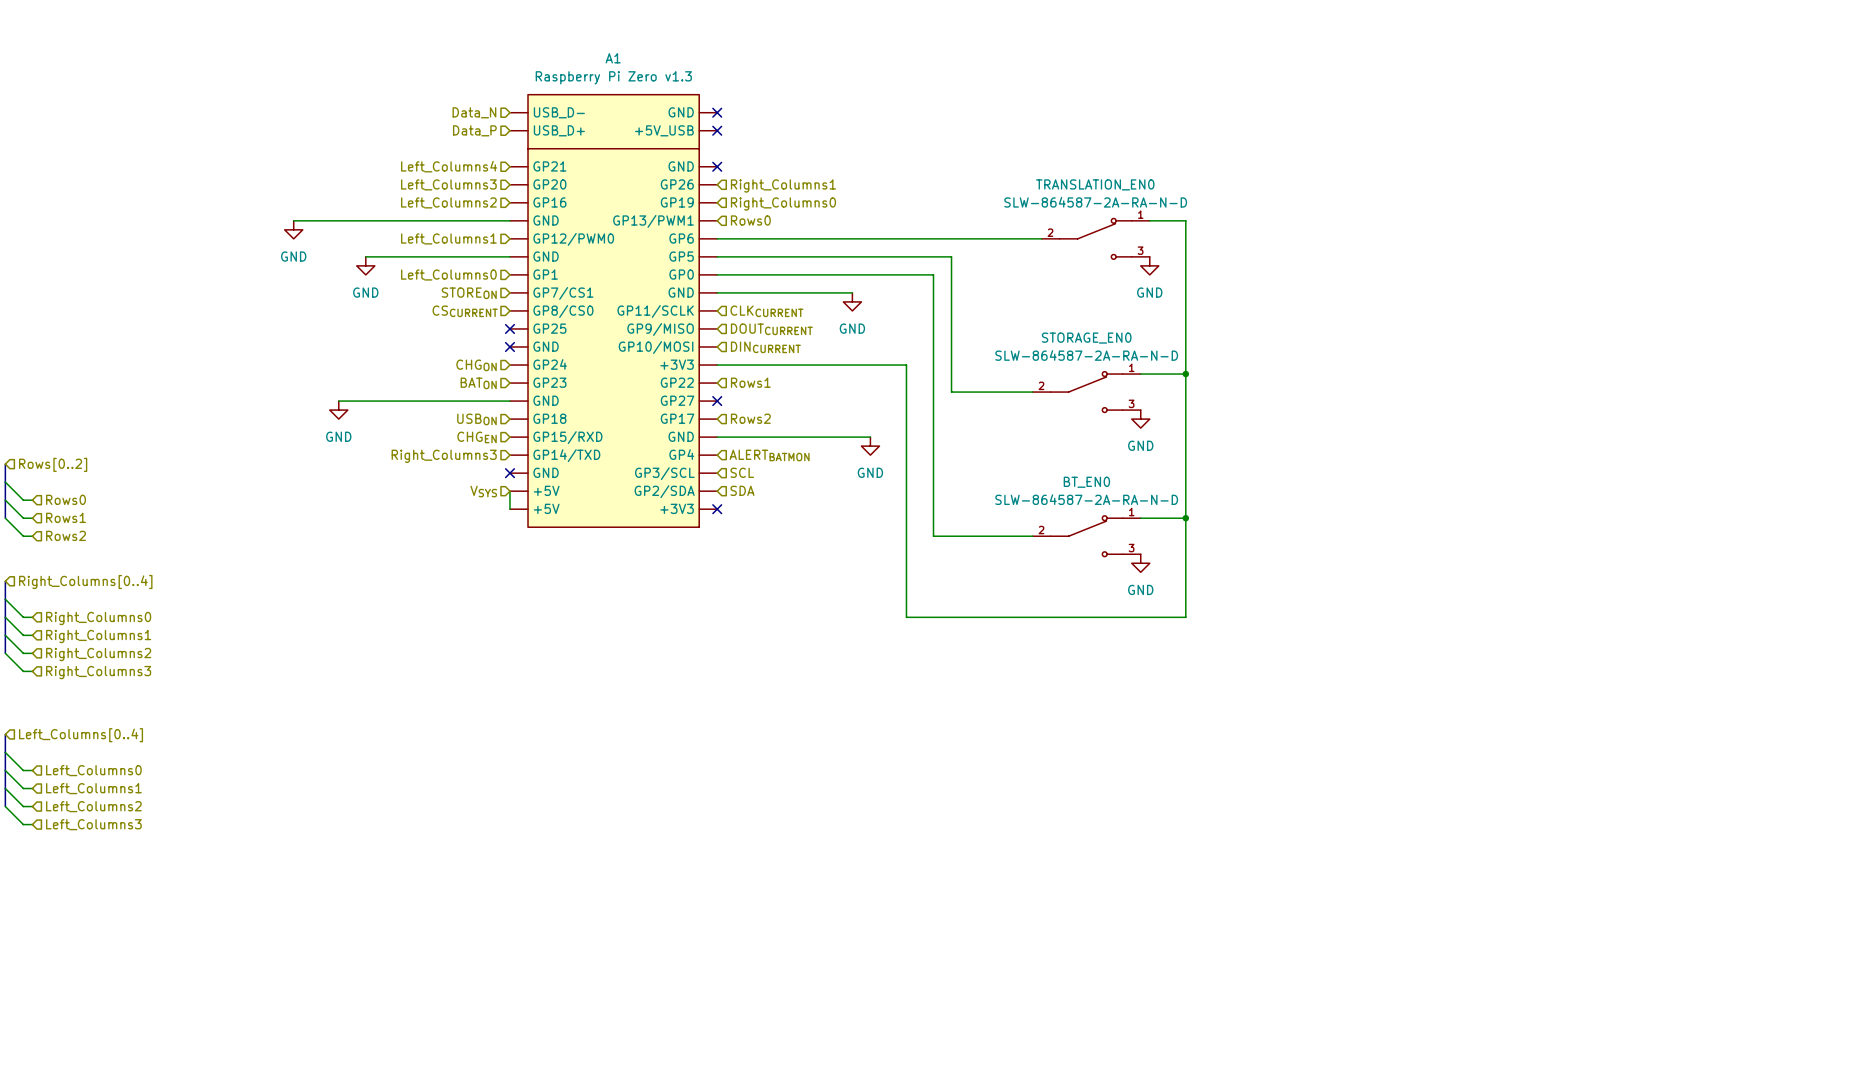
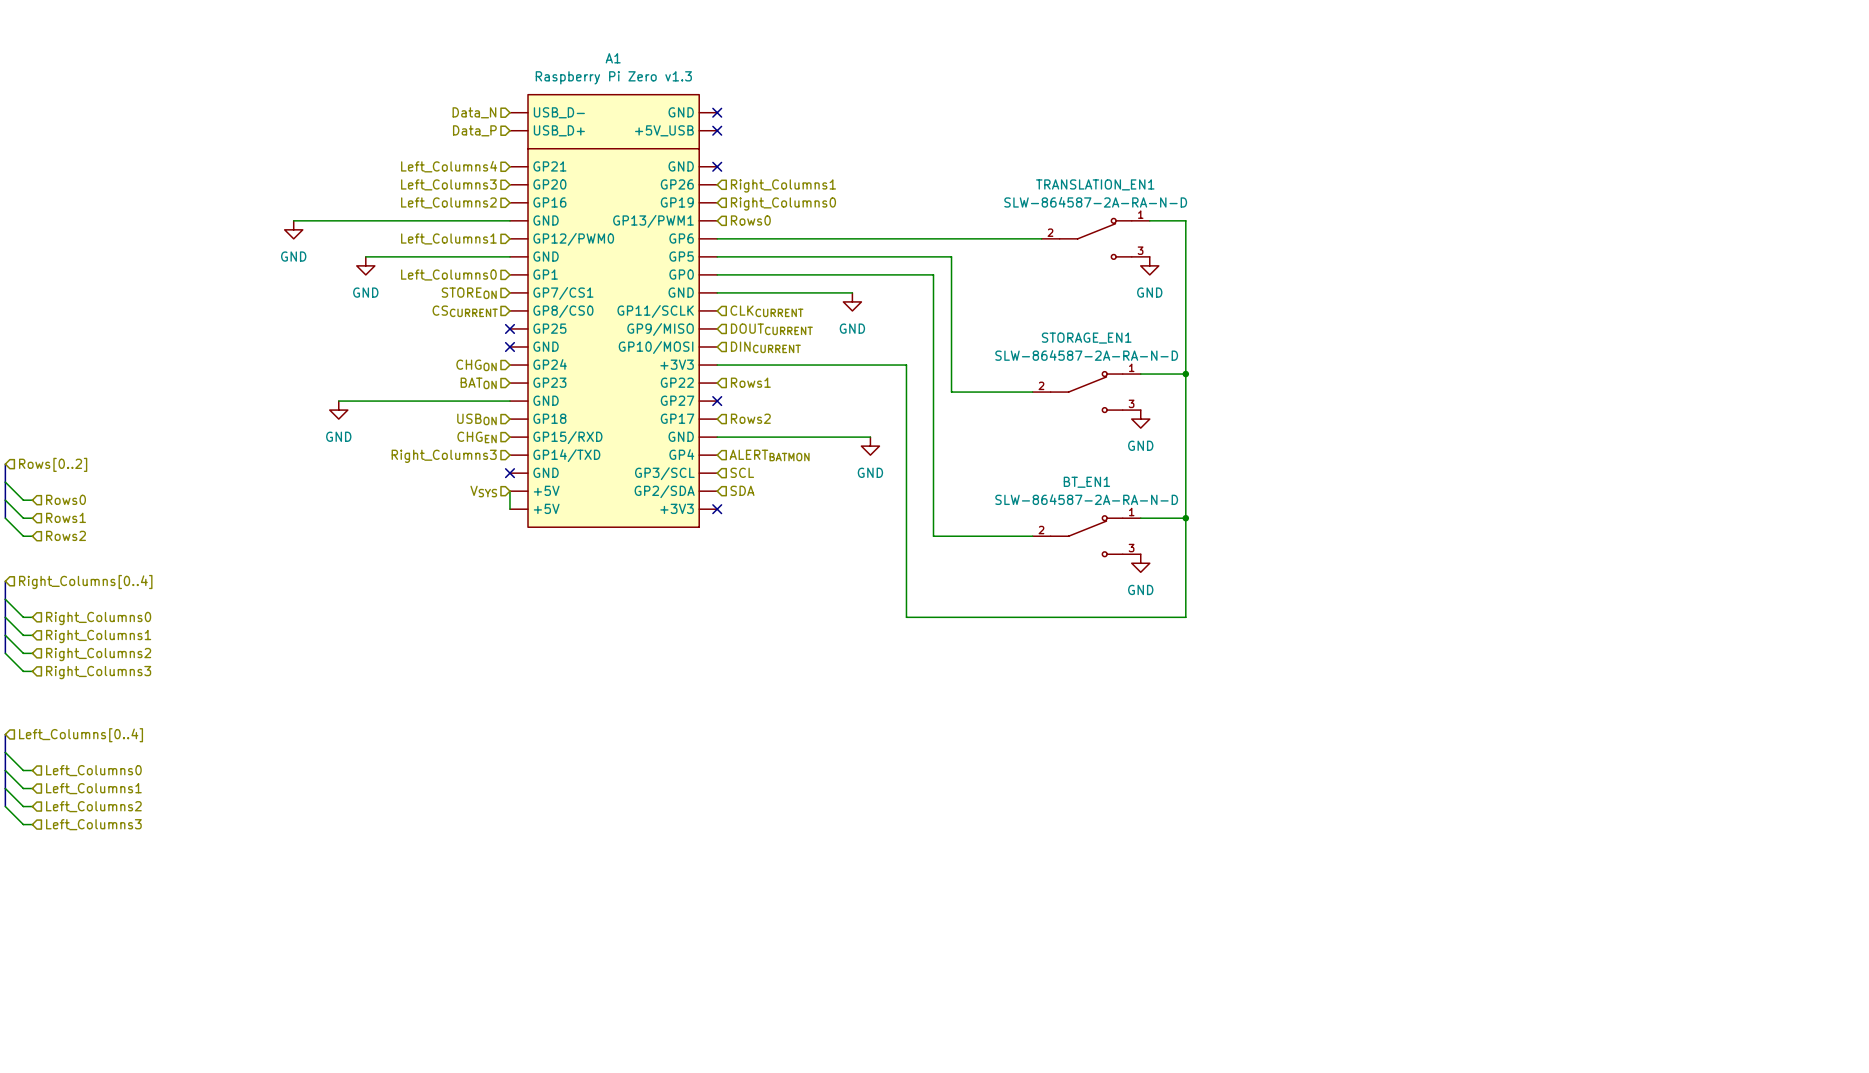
TRANSLATION_EN0 name: TRANSLATION_EN0 (1095, 184) -> TRANSLATION_EN1 (1095, 184)
STORAGE_EN0 name: STORAGE_EN0 (1086, 338) -> STORAGE_EN1 (1086, 338)
BT_EN0 name: BT_EN0 (1086, 482) -> BT_EN1 (1086, 482)

